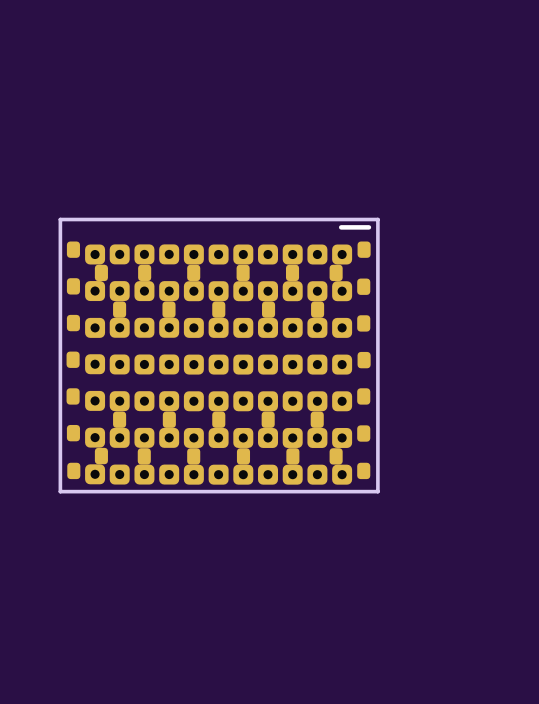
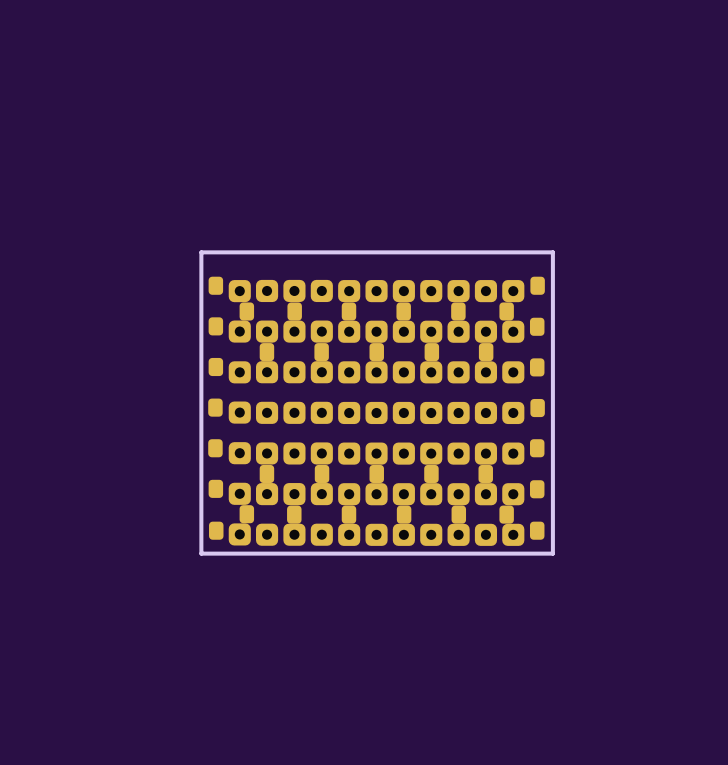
text: - (355, 227) -> none

